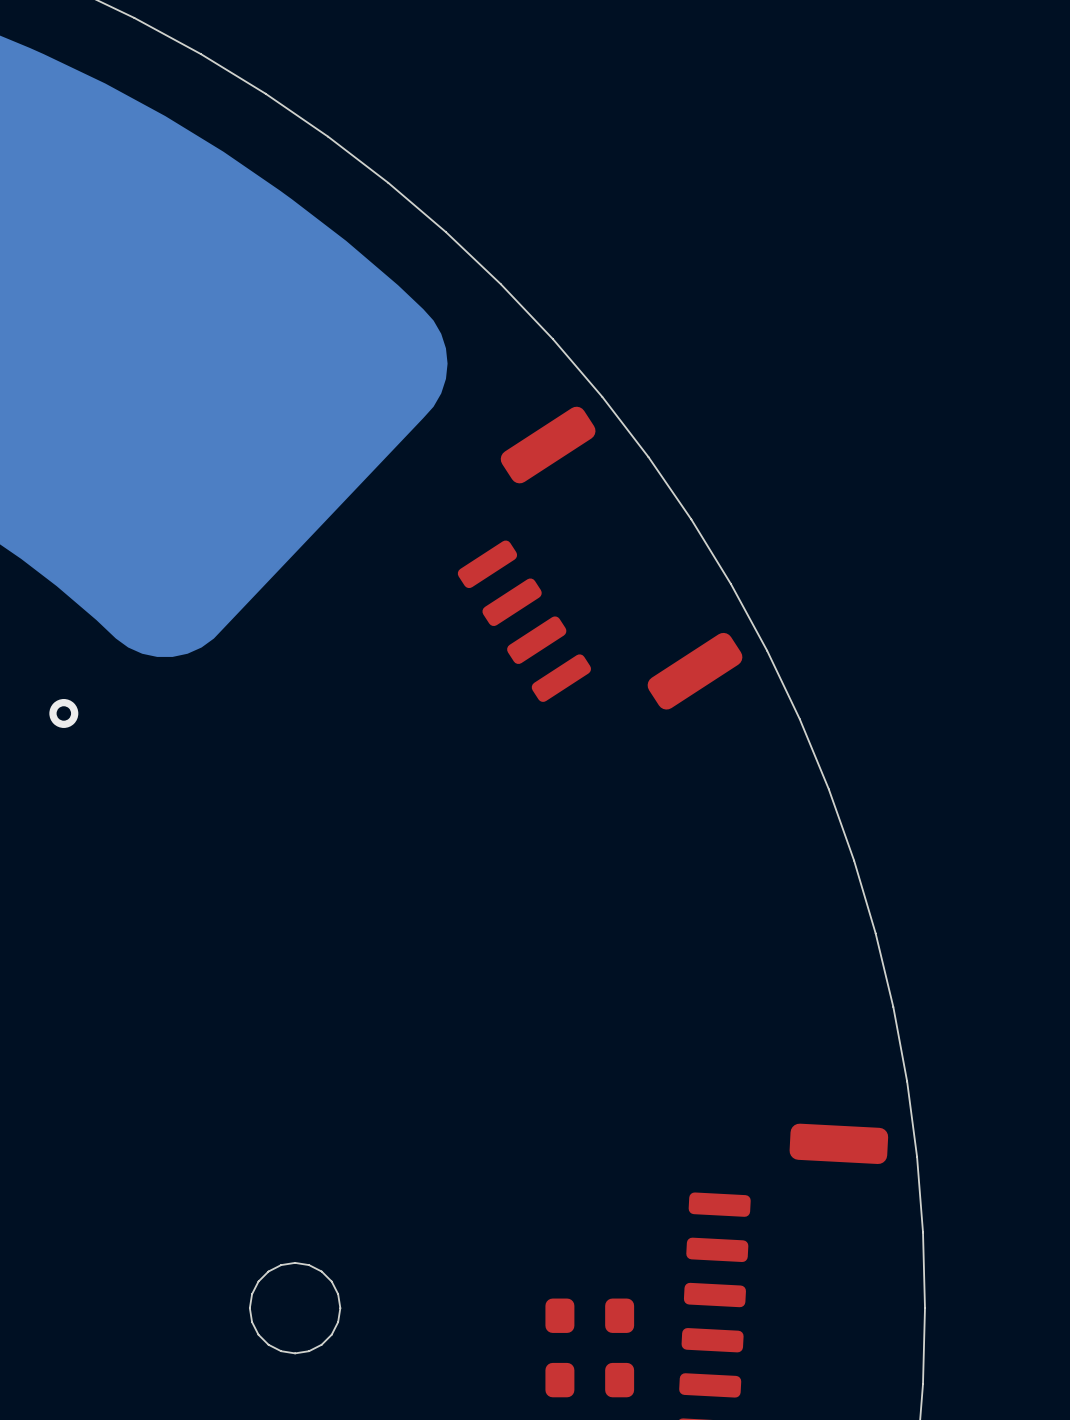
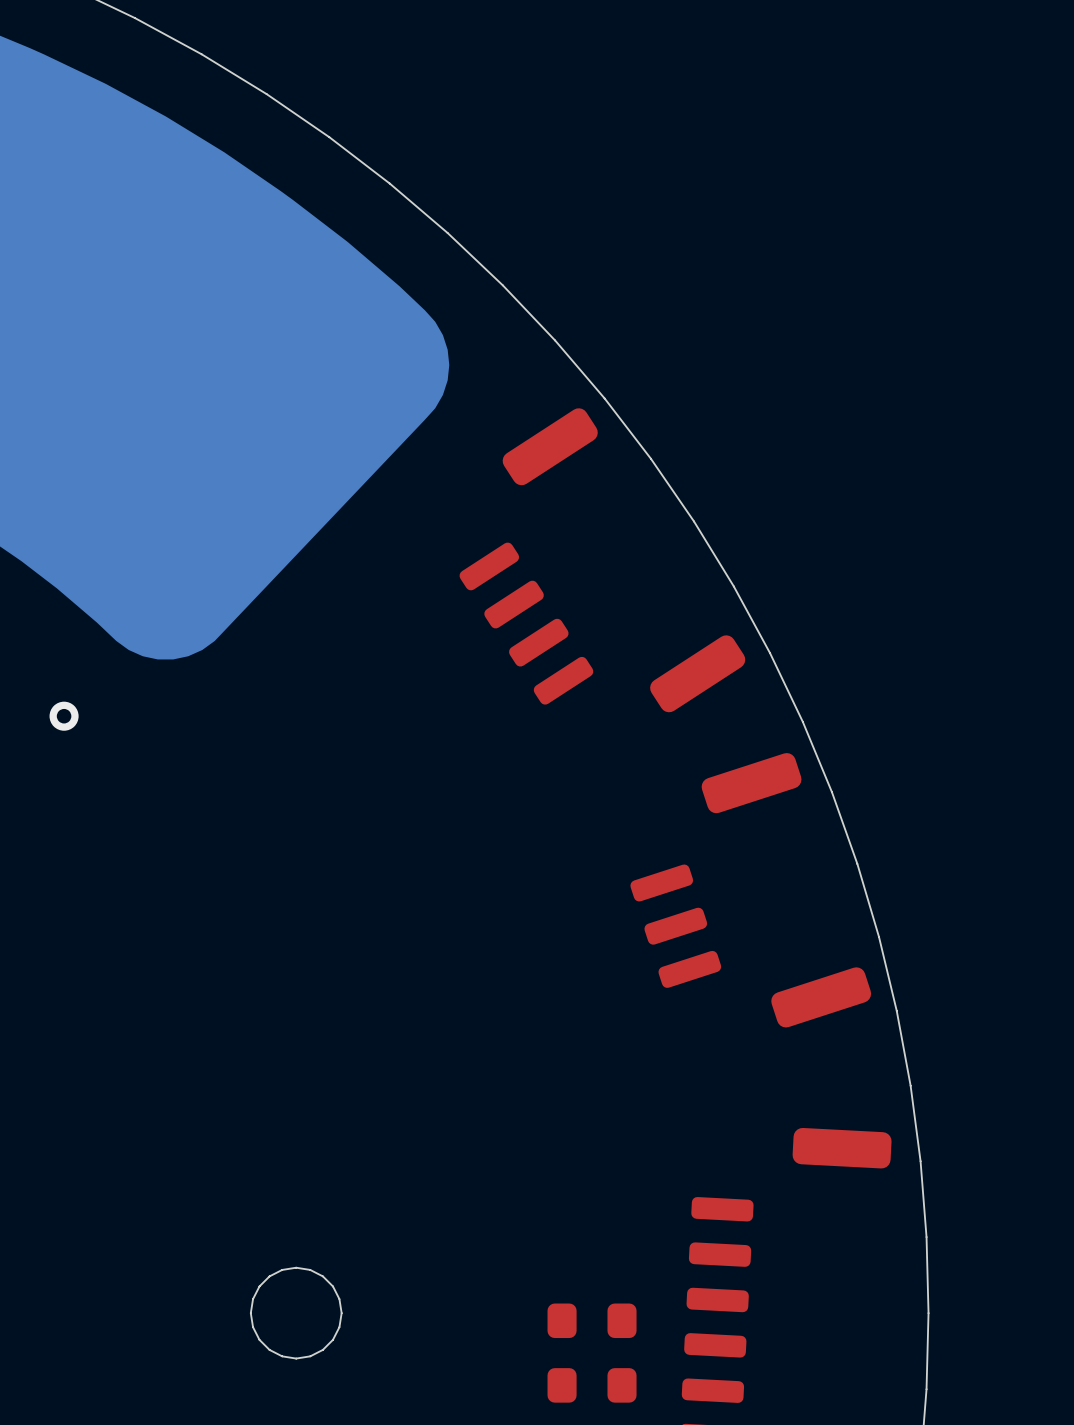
part: none -> (750, 890)

